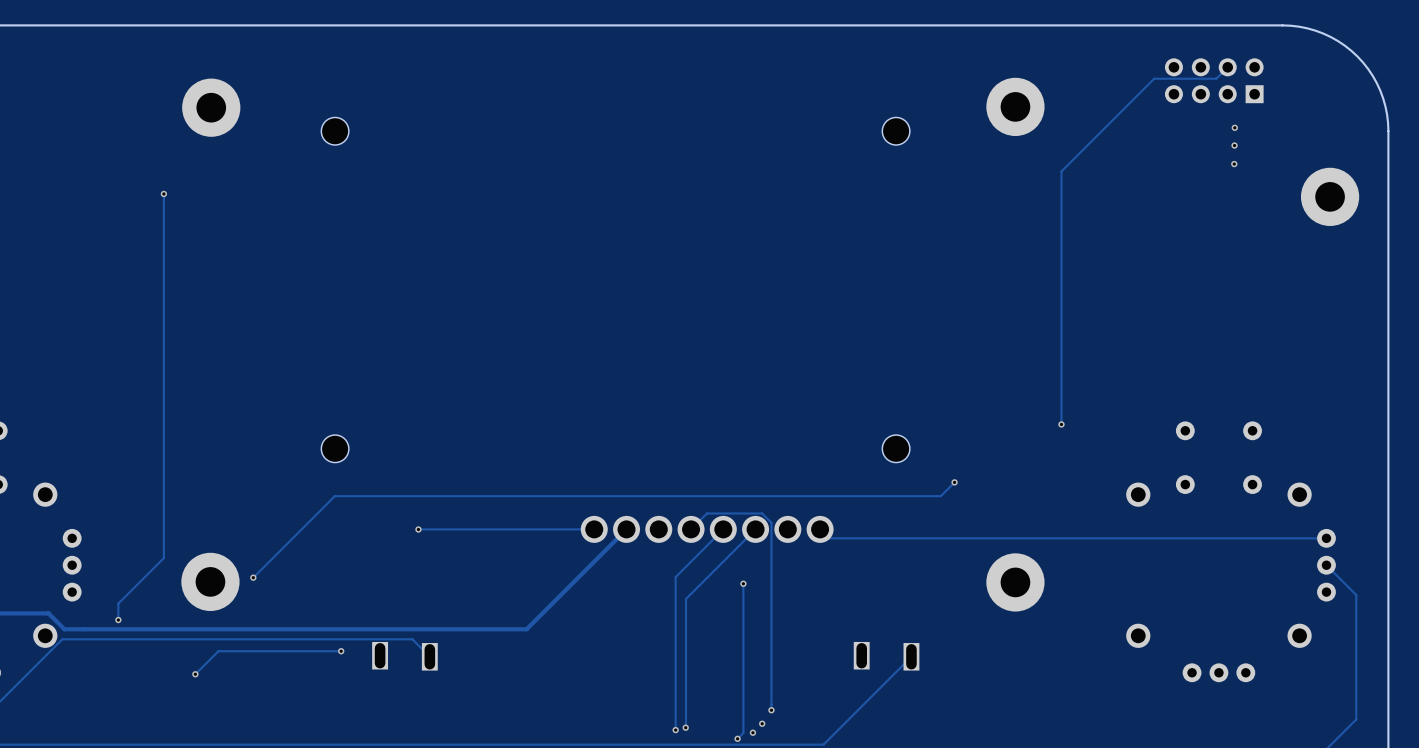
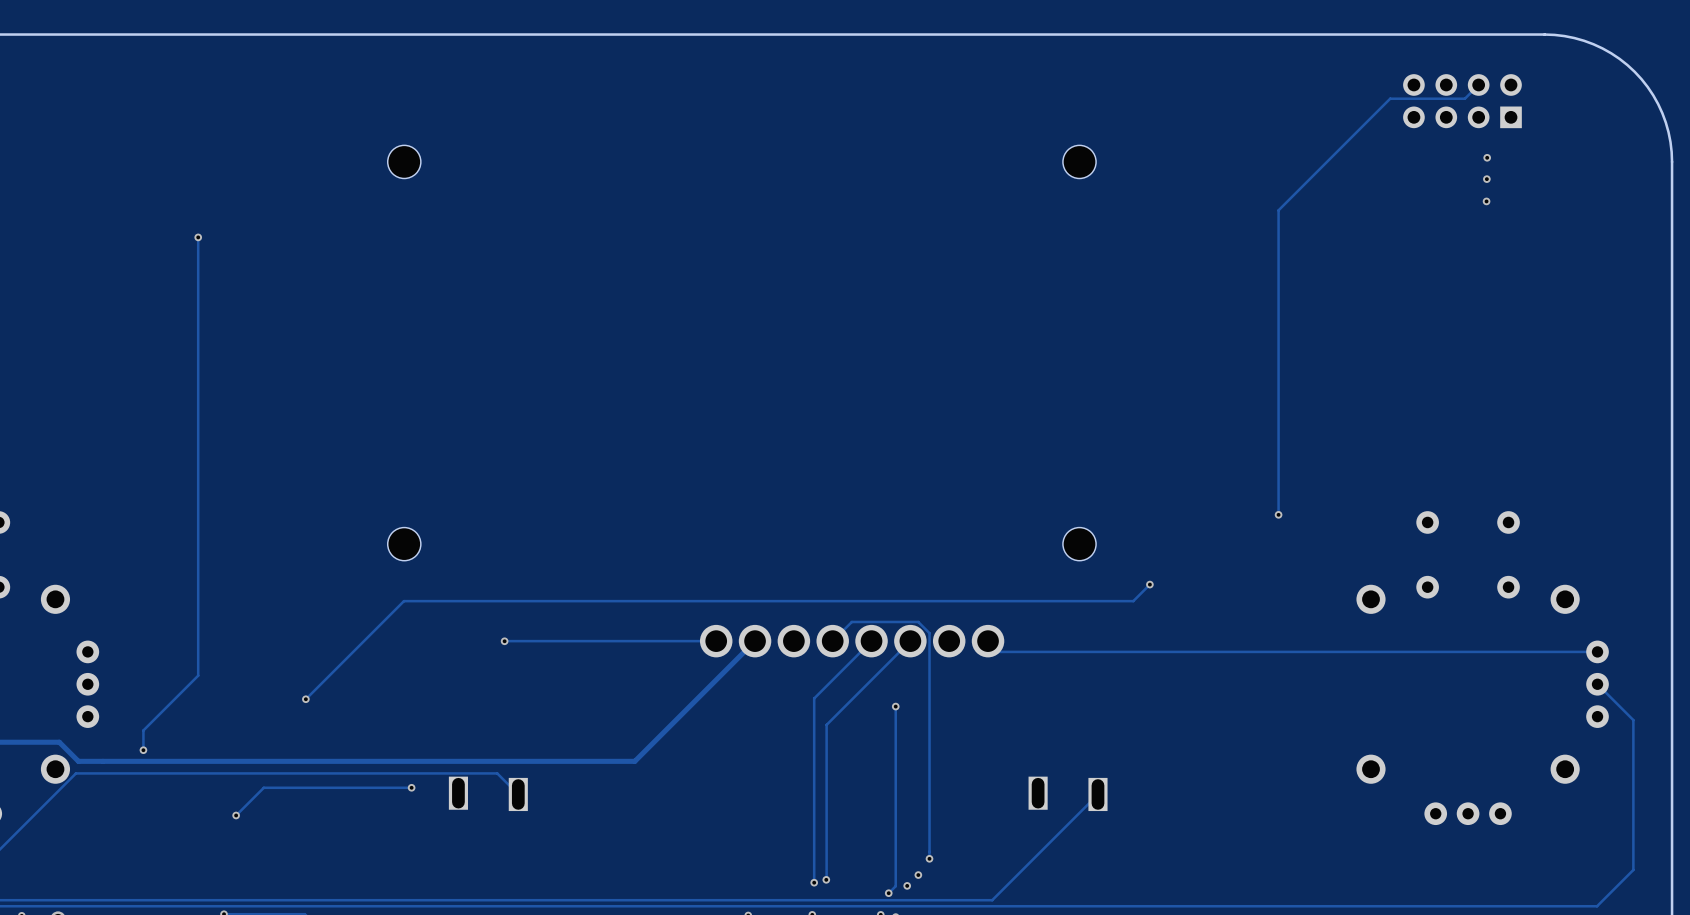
part: (1015, 106) -> none
part: (211, 107) -> none
part: (1330, 196) -> none
part: (210, 581) -> none
part: (1015, 582) -> none

